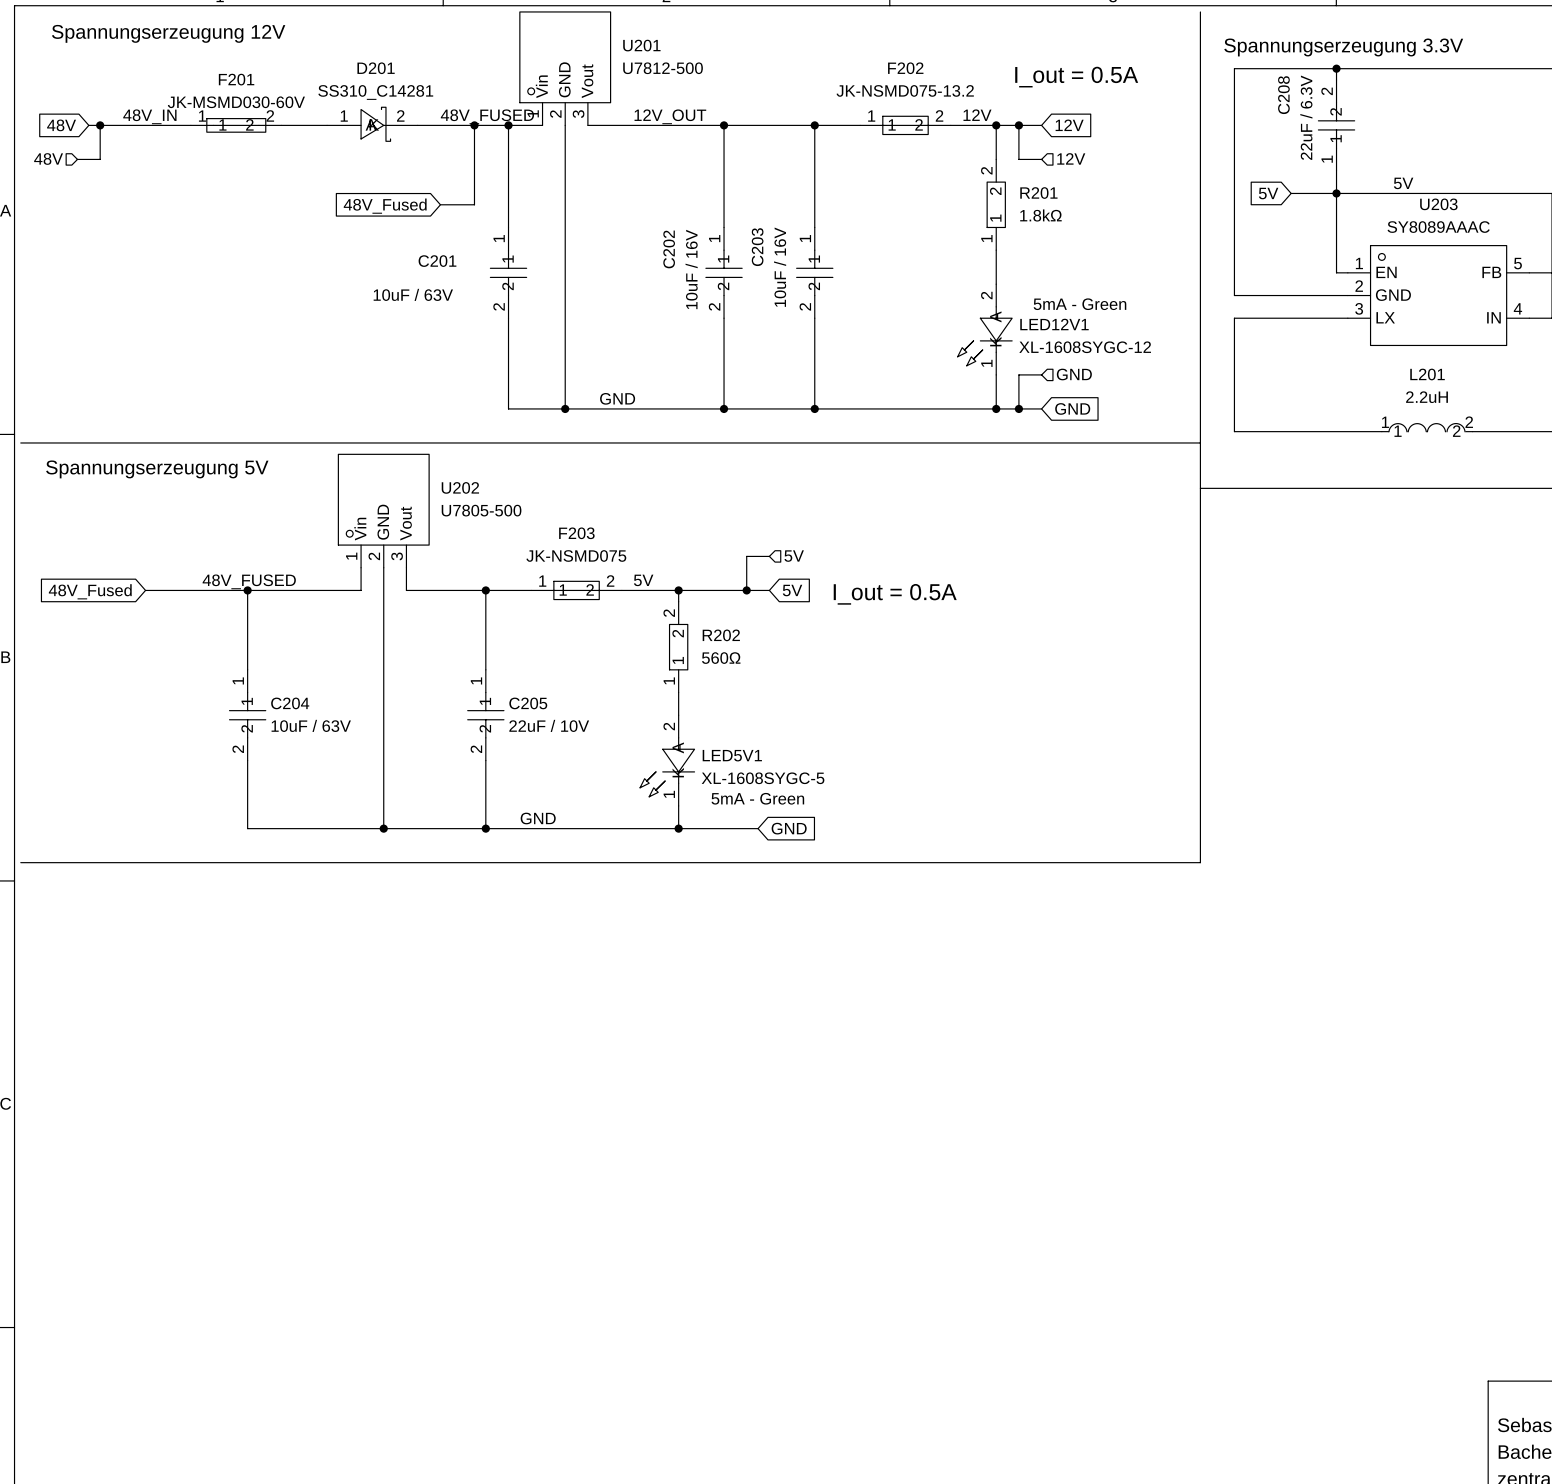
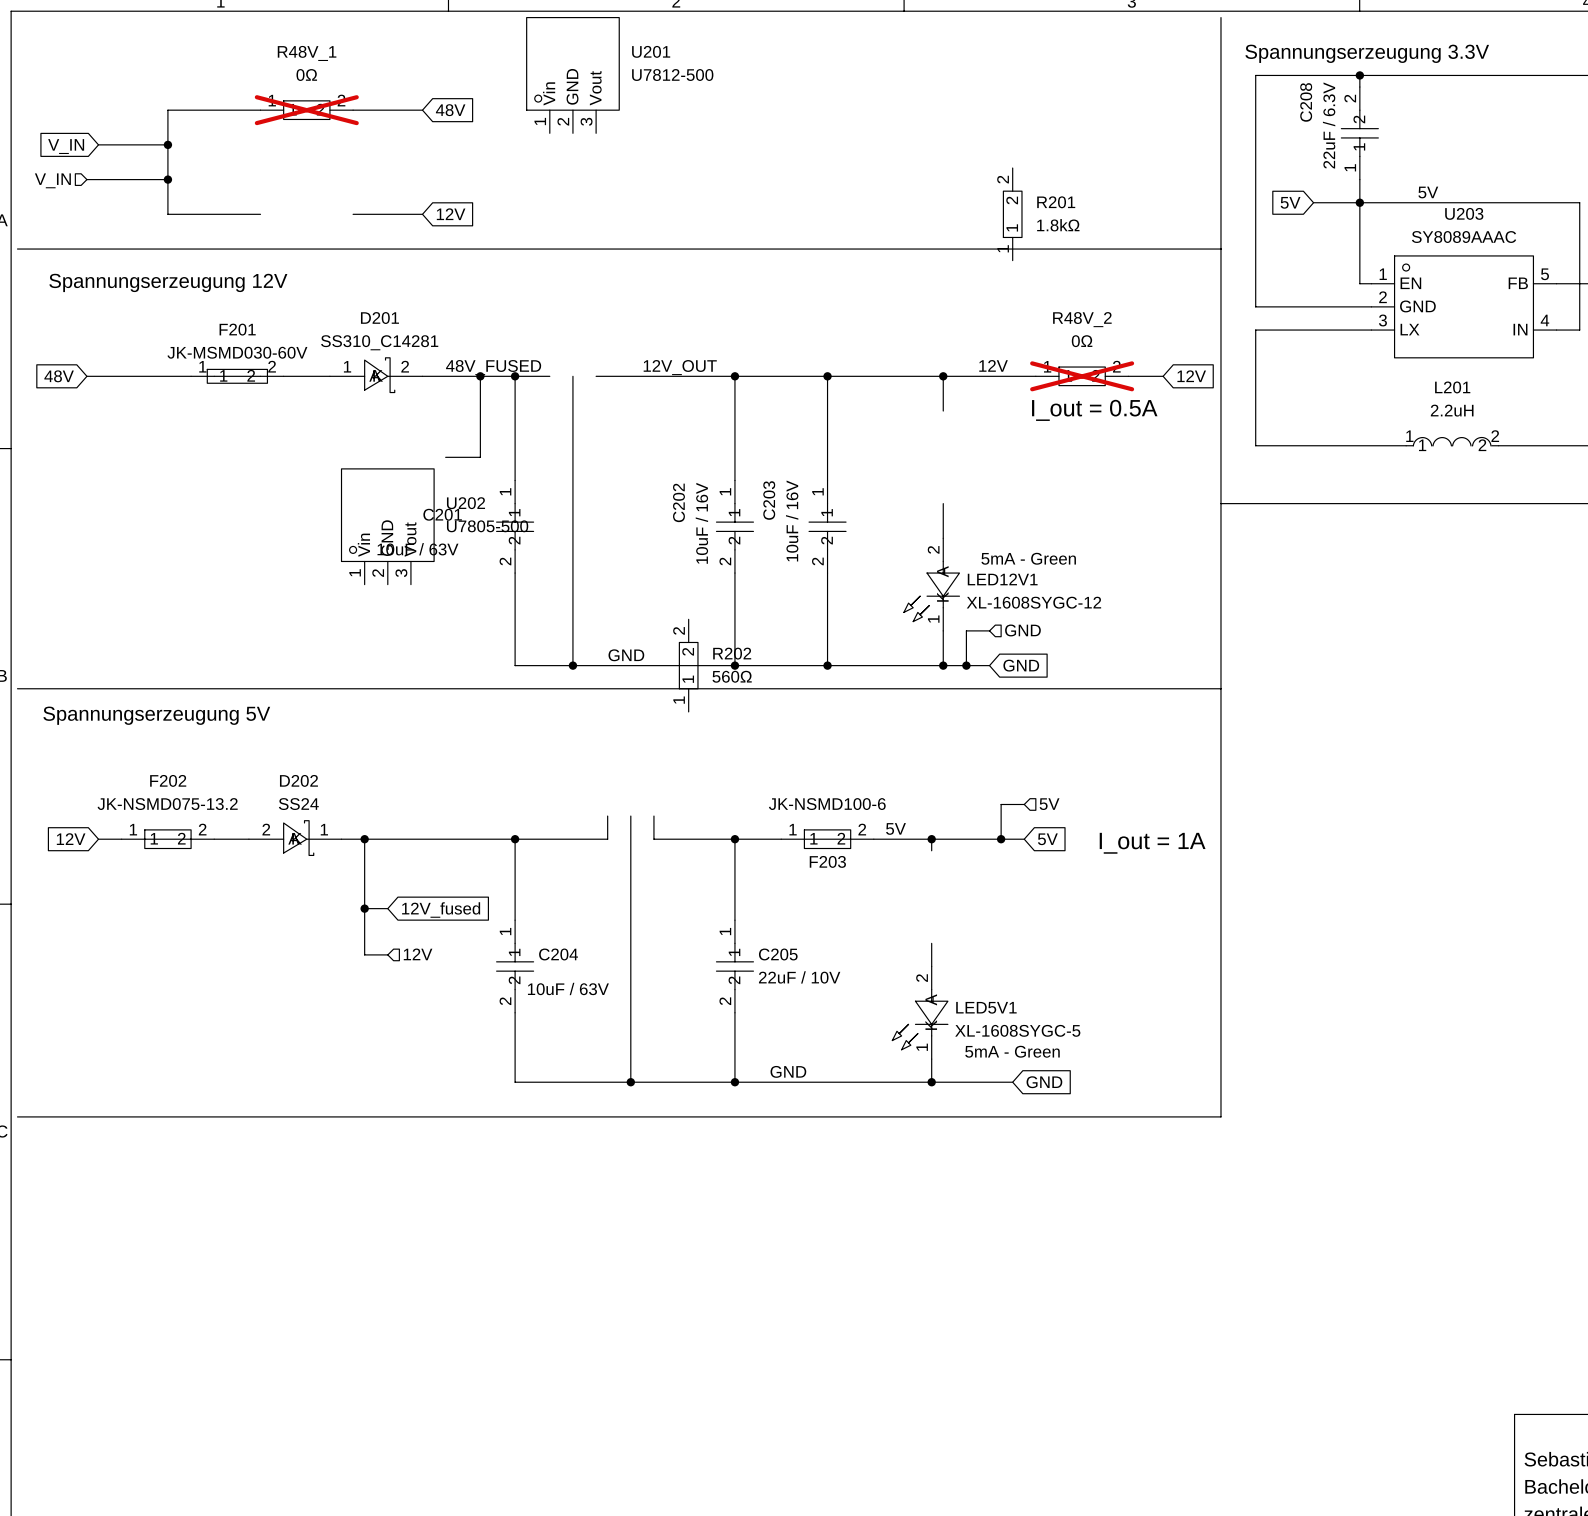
text: Spannungserzeugung 12V (168, 33) -> none
text: I_out = 0.5A (1076, 77) -> none
wire: none -> (260, 110) (167, 110) (167, 214) (260, 214)
R48V_1: none -> 0Ω (306, 110)
wire: none -> (353, 110) (422, 110)
global label: none -> 48V (450, 110)
label: 12V (977, 115) -> none
label: 48V_IN (149, 116) -> none
label: 48V_FUSED (487, 116) -> none
label: 12V_OUT (670, 116) -> none
D201 position: (372, 124) -> (376, 375)
global label: 48V (61, 125) -> none
wire: (88, 125) (190, 125) -> none
wire: (100, 125) (100, 159) (77, 159) -> none
junction: (100, 125) -> none
F201 position: (236, 125) -> (237, 376)
wire: (281, 125) (327, 125) -> none
wire: (417, 125) (542, 125) -> none
wire: (474, 125) (474, 204) (440, 204) -> none
junction: (474, 125) -> none
wire: (508, 125) (508, 227) -> none
junction: (508, 125) -> none
wire: (565, 125) (565, 363) -> none
wire: (587, 125) (860, 125) -> none
wire: (724, 125) (724, 227) -> none
junction: (724, 125) -> none
wire: (814, 125) (814, 227) -> none
junction: (814, 125) -> none
F202 position: (905, 125) -> (167, 839)
wire: (950, 125) (1041, 125) -> none
wire: (996, 125) (996, 159) -> none
junction: (996, 125) -> none
wire: (1018, 125) (1018, 159) (1041, 159) -> none
junction: (1018, 125) -> none
global label: 12V (1069, 125) -> none
wire: none -> (98, 144) (167, 144)
junction: none -> (167, 144)
global label: none -> V_IN (66, 146)
hierarchical label: 48V (48, 158) -> none
hierarchical label: 12V (1071, 158) -> none
wire: none -> (86, 179) (167, 179)
junction: none -> (167, 179)
hierarchical label: none -> V_IN (52, 180)
wire: none -> (353, 214) (422, 214)
global label: none -> 12V (451, 214)
global label: 48V_Fused (385, 206) -> none
wire: (996, 250) (996, 284) -> (943, 376) (943, 411)
text: none -> Spannungserzeugung 12V (168, 282)
C201 position: (508, 272) -> (515, 526)
C202 position: (724, 272) -> (734, 526)
C203 position: (814, 272) -> (827, 526)
text: 5mA - Green (1079, 304) -> none
wire: (508, 318) (508, 363) -> none
wire: (724, 318) (724, 363) -> none
wire: (814, 318) (814, 363) -> none
LED12V1 position: (984, 329) -> (931, 584)
label: none -> 12V (993, 365)
label: none -> 48V_FUSED (493, 367)
label: none -> 12V_OUT (680, 367)
global label: none -> 48V (59, 376)
wire: none -> (86, 376) (191, 376)
wire: none -> (283, 376) (329, 376)
wire: none -> (422, 376) (549, 376)
wire: none -> (480, 376) (480, 457) (445, 457)
junction: none -> (480, 376)
junction: none -> (515, 376)
wire: none -> (596, 376) (1035, 376)
junction: none -> (943, 376)
R48V_2: none -> 0Ω (1082, 376)
wire: none -> (1128, 376) (1163, 376)
global label: none -> 12V (1191, 376)
wire: (996, 374) (996, 408) -> (943, 503) (943, 538)
wire: (1041, 374) (1018, 374) (1018, 408) -> none
hierarchical label: GND (1074, 374) -> none
text: none -> I_out = 0.5A (1094, 410)
label: GND (617, 398) -> none
wire: (508, 408) (1041, 408) -> (515, 422) (515, 480)
wire: none -> (572, 422) (572, 665)
junction: (565, 408) -> none
wire: none -> (734, 422) (734, 480)
junction position: (724, 408) -> (734, 376)
wire: none -> (827, 422) (827, 480)
junction position: (814, 408) -> (827, 376)
junction: (996, 408) -> none
junction: (1018, 408) -> none
global label: GND (1072, 408) -> none
line: (20, 442) (1200, 442) -> (17, 249) (1220, 249)
text: Spannungserzeugung 5V (157, 469) -> none
F203 name position: F203 (576, 533) -> F203 (827, 861)
text: none -> 5mA - Green (1028, 558)
F203 value: JK-NSMD075 (576, 555) -> JK-NSMD100-6 (827, 804)
wire: none -> (515, 573) (515, 665) (989, 665)
wire: none -> (734, 573) (734, 665)
wire: (769, 556) (746, 556) (746, 590) -> (989, 630) (966, 630) (966, 665)
hierarchical label: 5V (794, 556) -> none
wire: none -> (827, 573) (827, 665)
wire: (361, 567) (361, 590) (145, 590) -> none
wire: (383, 567) (383, 828) -> none
wire: (406, 567) (406, 590) (531, 590) -> none
label: 5V (643, 580) -> none
label: 48V_FUSED (249, 581) -> none
wire: (247, 590) (247, 669) -> none
junction: (247, 590) -> none
wire: (485, 590) (485, 669) -> none
junction: (485, 590) -> none
F203 position: (576, 590) -> (827, 839)
wire: (621, 590) (769, 590) -> none
wire: (678, 590) (678, 601) -> none
junction: (678, 590) -> none
junction: (746, 590) -> none
global label: 5V (792, 590) -> none
global label: 48V_Fused (90, 591) -> none
text: I_out = 0.5A (895, 594) -> none
hierarchical label: none -> GND (1022, 630)
wire: none -> (943, 630) (943, 665)
label: none -> GND (626, 655)
junction: none -> (572, 665)
junction: none -> (734, 665)
junction: none -> (827, 665)
junction: none -> (943, 665)
junction: none -> (966, 665)
global label: none -> GND (1021, 665)
line: none -> (17, 688) (1220, 688)
wire: (678, 692) (678, 715) -> none
text: none -> Spannungserzeugung 5V (156, 715)
C204 position: (247, 715) -> (515, 966)
C205 position: (485, 715) -> (734, 966)
C204 value position: 10uF / 63V (311, 725) -> 10uF / 63V (568, 988)
wire: (247, 760) (247, 828) (758, 828) -> none
wire: (485, 760) (485, 828) -> none
LED5V1 position: (667, 760) -> (920, 1012)
hierarchical label: none -> 5V (1049, 804)
wire: none -> (1024, 804) (1001, 804) (1001, 839)
wire: none -> (607, 816) (607, 839) (341, 839)
wire: none -> (630, 816) (630, 1082)
wire: none -> (653, 816) (653, 839) (781, 839)
text: 5mA - Green (757, 798) -> none
wire: (678, 805) (678, 828) -> none
label: none -> 5V (895, 828)
D202: none -> SS24 (295, 838)
global label: none -> 12V (71, 839)
wire: none -> (98, 839) (121, 839)
wire: none -> (214, 839) (248, 839)
wire: none -> (364, 839) (364, 954) (387, 954)
wire: none -> (515, 839) (515, 920)
wire: none -> (734, 839) (734, 920)
wire: none -> (873, 839) (1024, 839)
wire: none -> (931, 839) (931, 850)
junction: none -> (931, 839)
junction: none -> (1001, 839)
global label: none -> 5V (1047, 839)
label: GND (538, 818) -> none
text: none -> I_out = 1A (1152, 843)
junction position: (383, 828) -> (364, 839)
junction position: (485, 828) -> (515, 839)
junction position: (678, 828) -> (734, 839)
global label: GND (789, 828) -> none
line: (20, 862) (1200, 862) -> (17, 1116) (1220, 1116) (1220, 885)
wire: none -> (364, 908) (387, 908)
junction: none -> (364, 908)
global label: none -> 12V_fused (441, 910)
wire: none -> (931, 943) (931, 966)
hierarchical label: none -> 12V (418, 954)
wire: none -> (515, 1012) (515, 1082) (1012, 1082)
wire: none -> (734, 1012) (734, 1082)
text: none -> 5mA - Green (1012, 1051)
wire: none -> (931, 1059) (931, 1082)
label: none -> GND (788, 1071)
junction: none -> (630, 1082)
junction: none -> (734, 1082)
junction: none -> (931, 1082)
global label: none -> GND (1044, 1082)

